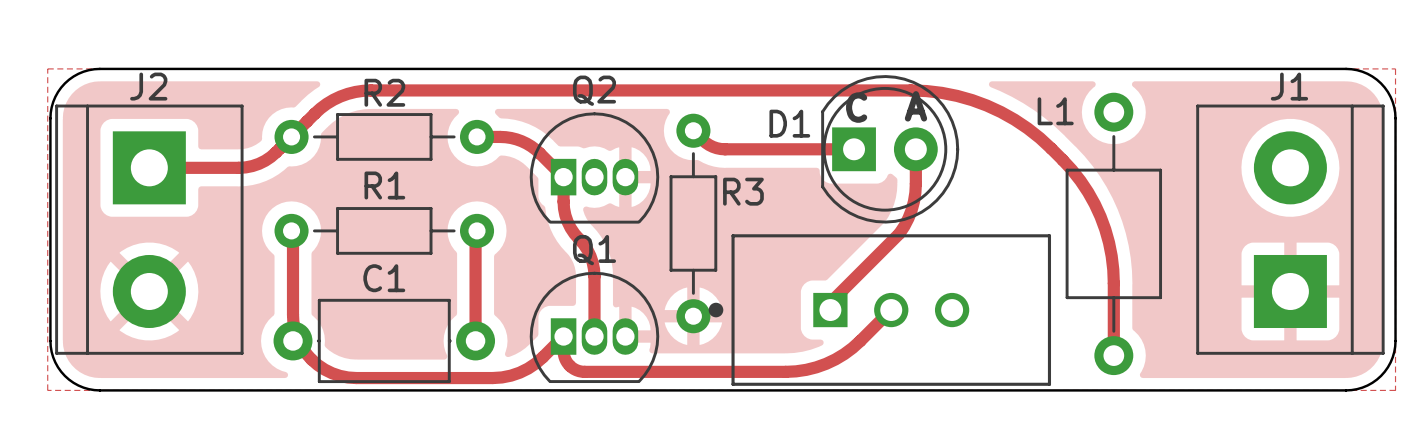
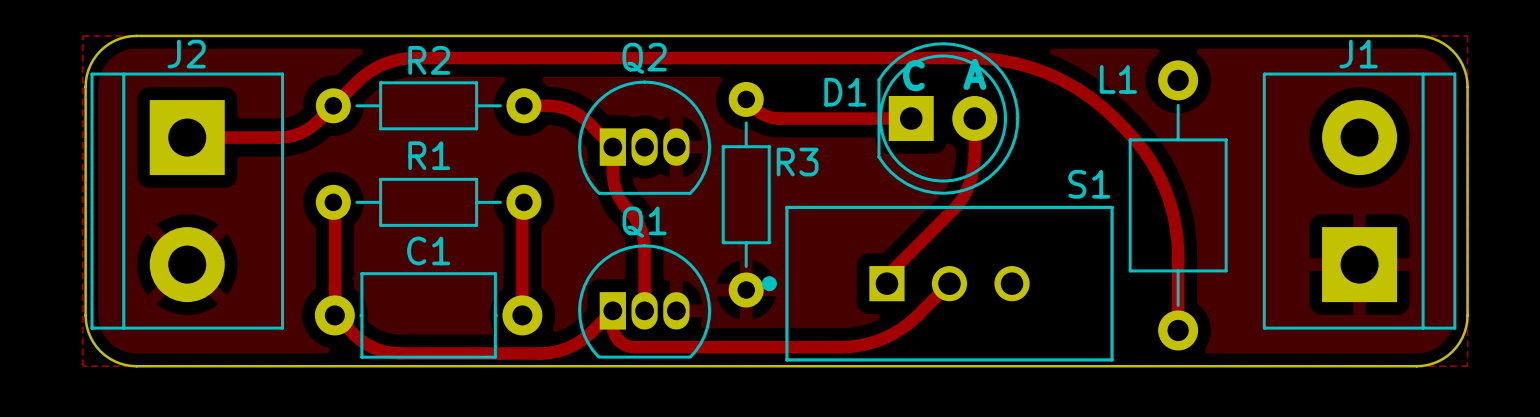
S1 name: none -> S1 (1089, 184)

